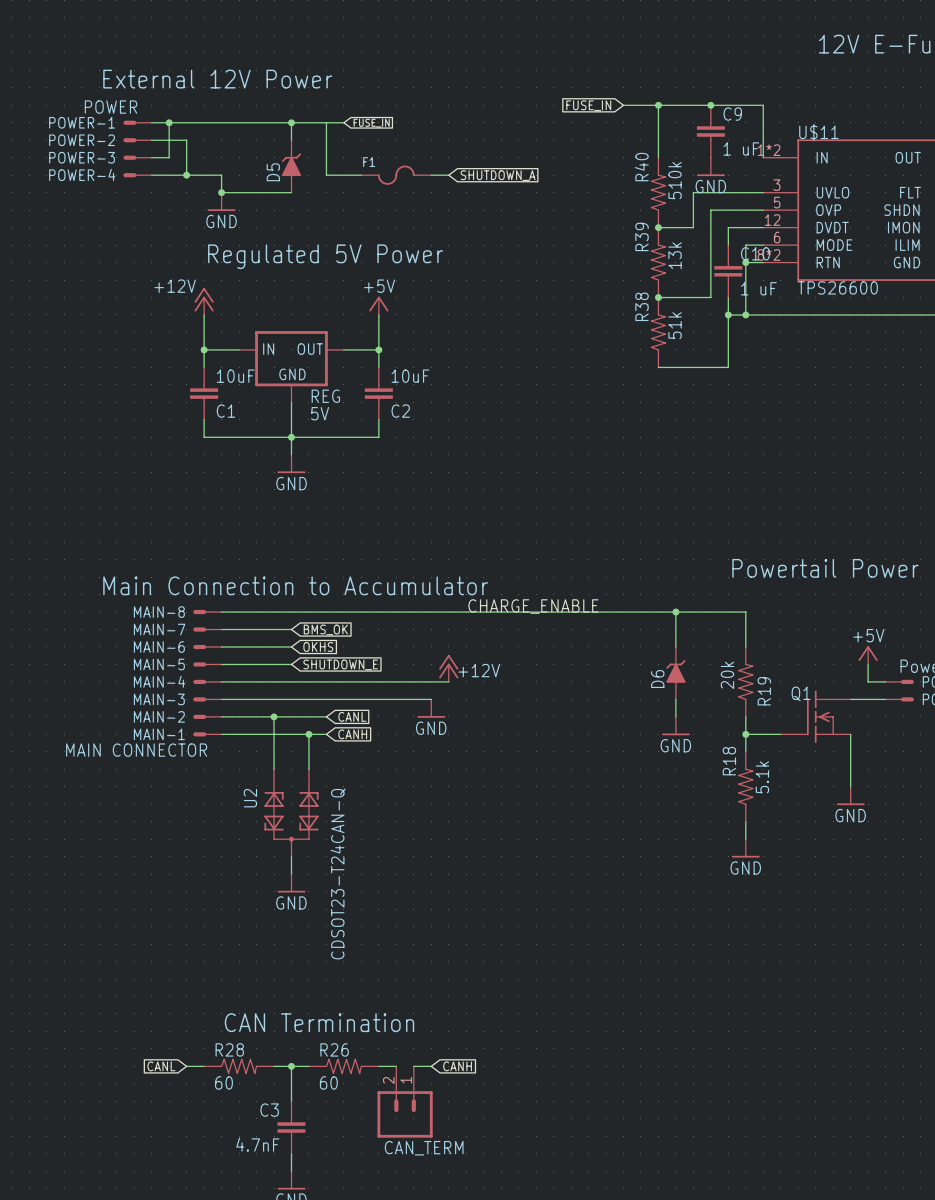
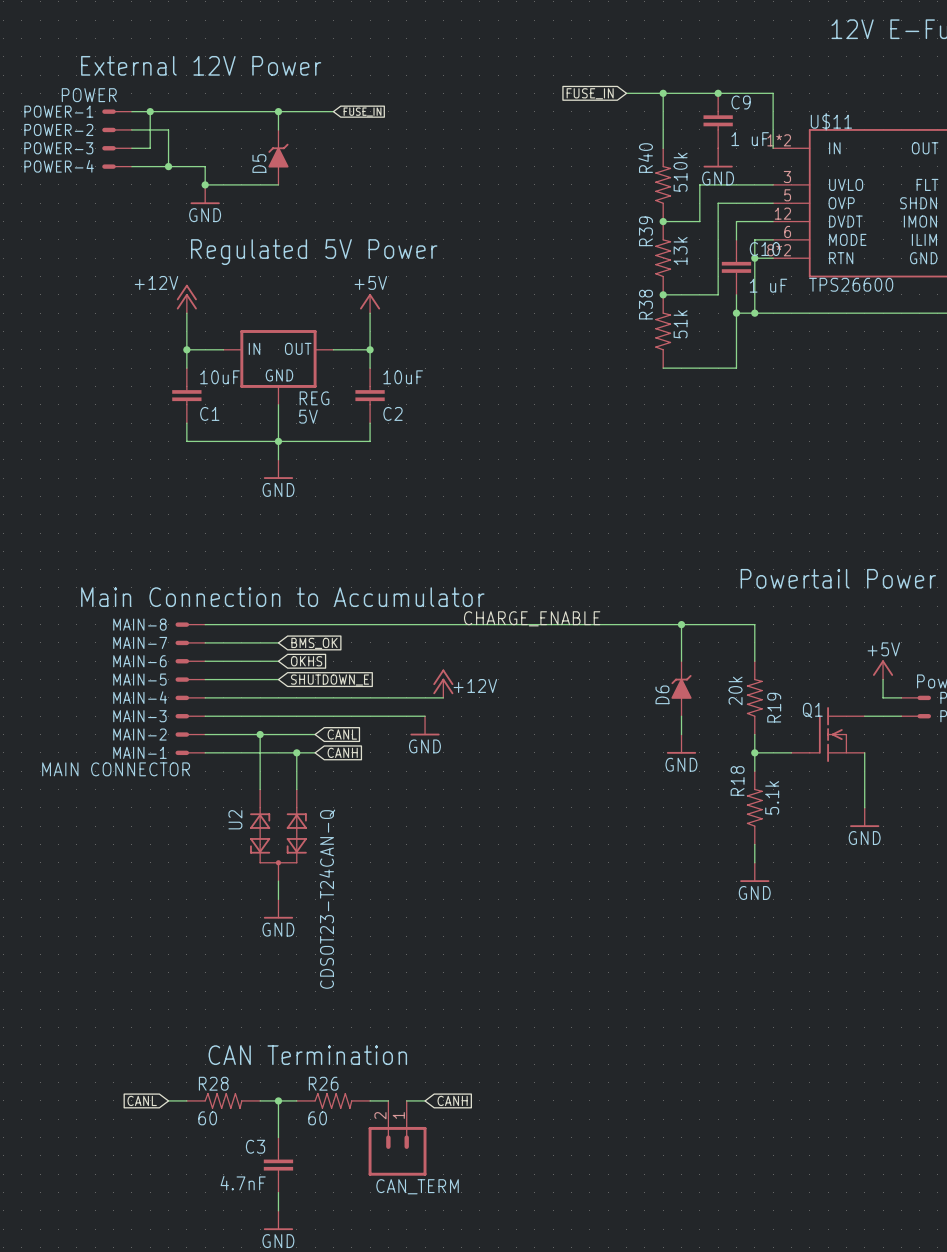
wire: (326, 122) (326, 175) (361, 175) -> none
F1: (396, 175) -> none
wire: (431, 175) (448, 175) -> none
global label: SHUTDOWN_A (498, 175) -> none

